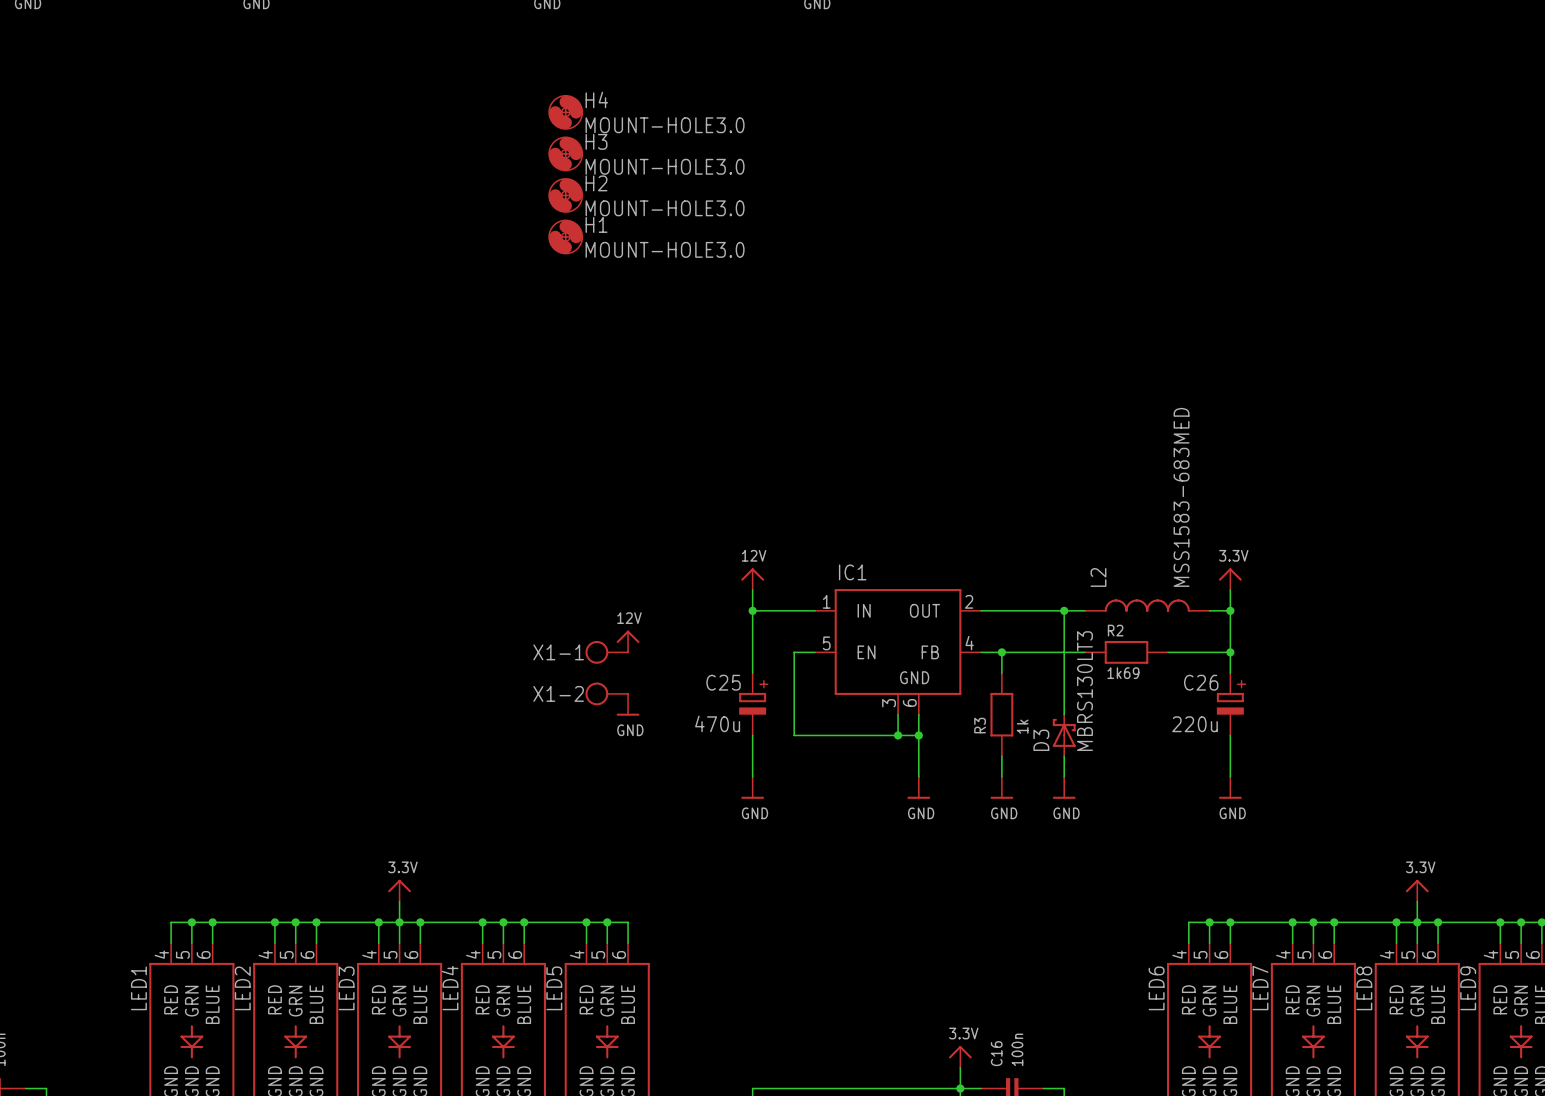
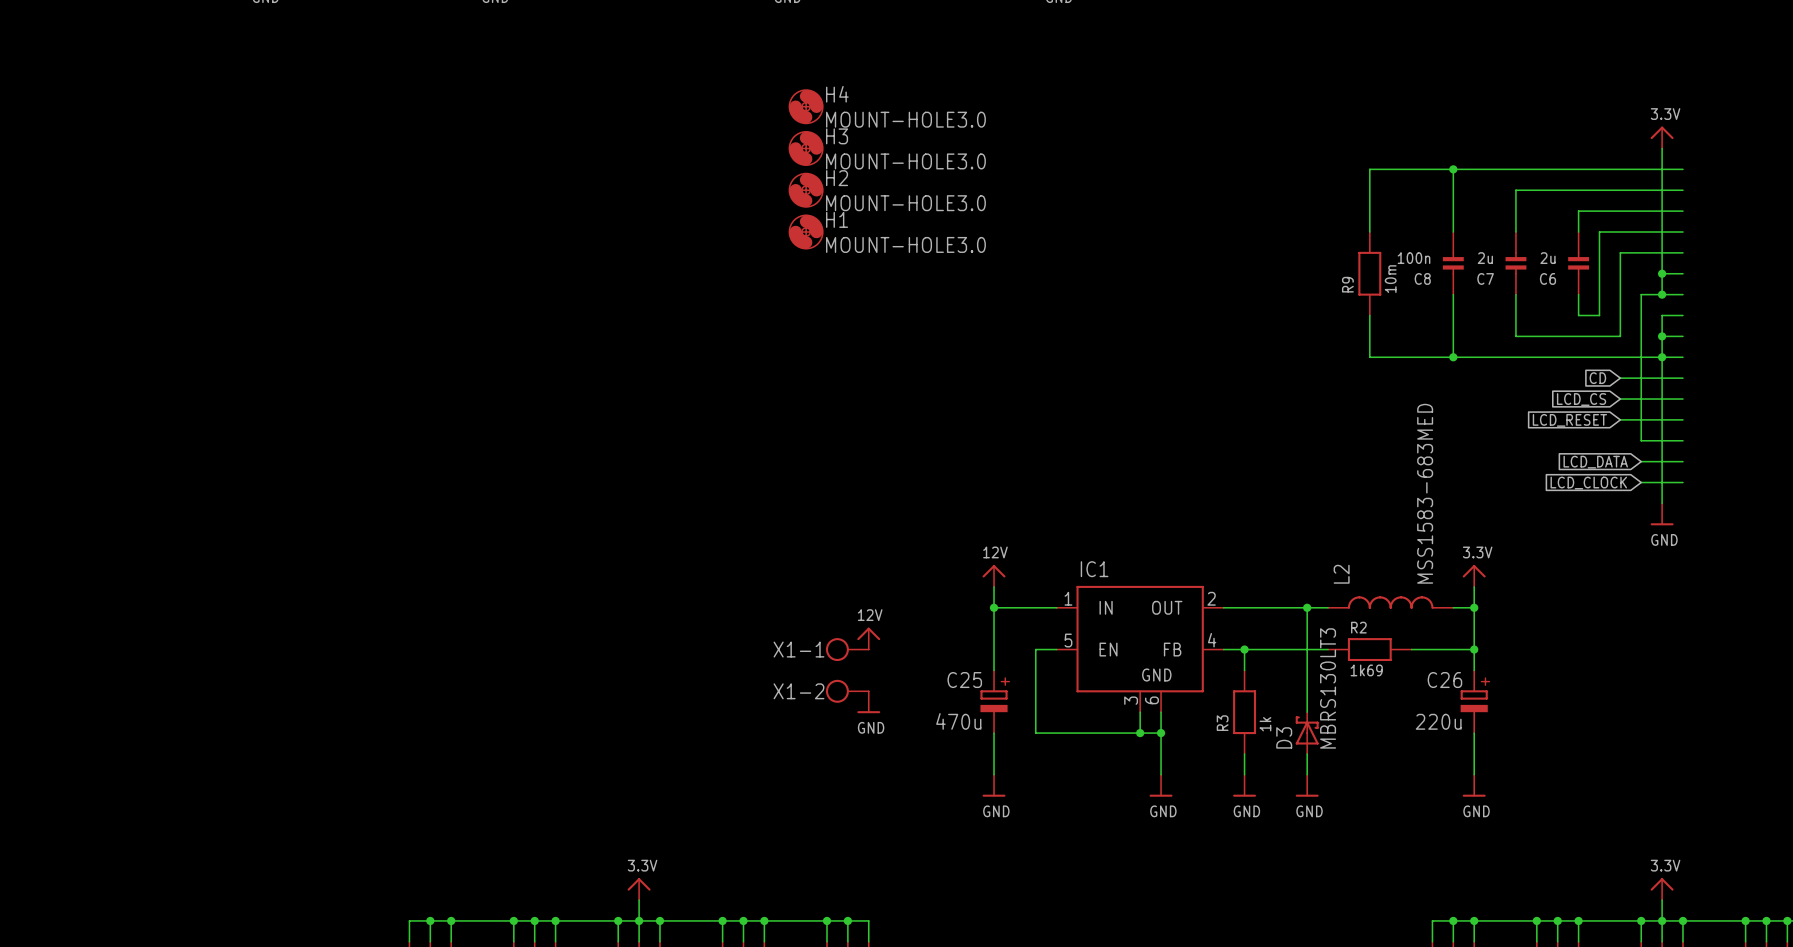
power symbol: none -> 3.3V (1662, 137)
wire: none -> (1662, 148) (1662, 294)
wire: none -> (1453, 169) (1453, 232)
junction: none -> (1453, 169)
wire: none -> (1682, 169) (1369, 169) (1369, 232)
wire: none -> (1682, 190) (1515, 190) (1515, 232)
wire: none -> (1682, 211) (1578, 211) (1578, 232)
wire: none -> (1682, 232) (1599, 232) (1599, 315) (1578, 315) (1578, 294)
wire: none -> (1682, 252) (1620, 252) (1620, 336) (1515, 336) (1515, 294)
C8: none -> 100n (1453, 263)
C7: none -> 2u (1515, 263)
C6: none -> 2u (1578, 263)
R9: none -> 10m (1369, 273)
wire: none -> (1662, 273) (1682, 273)
junction: none -> (1662, 273)
wire: none -> (1453, 294) (1453, 357)
junction: none -> (1662, 294)
wire: none -> (1682, 294) (1641, 294) (1641, 440) (1682, 440)
wire: none -> (1369, 315) (1369, 357) (1682, 357)
wire: none -> (1682, 315) (1662, 315) (1662, 503)
wire: none -> (1662, 336) (1682, 336)
junction: none -> (1662, 336)
junction: none -> (1453, 357)
junction: none -> (1662, 357)
global label: none -> CD (1597, 378)
wire: none -> (1620, 378) (1682, 378)
global label: none -> LCD_CS (1581, 399)
wire: none -> (1620, 399) (1682, 399)
wire: none -> (1620, 419) (1682, 419)
global label: none -> LCD_RESET (1569, 420)
global label: none -> LCD_DATA (1595, 462)
wire: none -> (1641, 461) (1682, 461)
global label: none -> LCD_CLOCK (1588, 483)
wire: none -> (1641, 482) (1682, 482)
power symbol: none -> GND (1662, 514)

